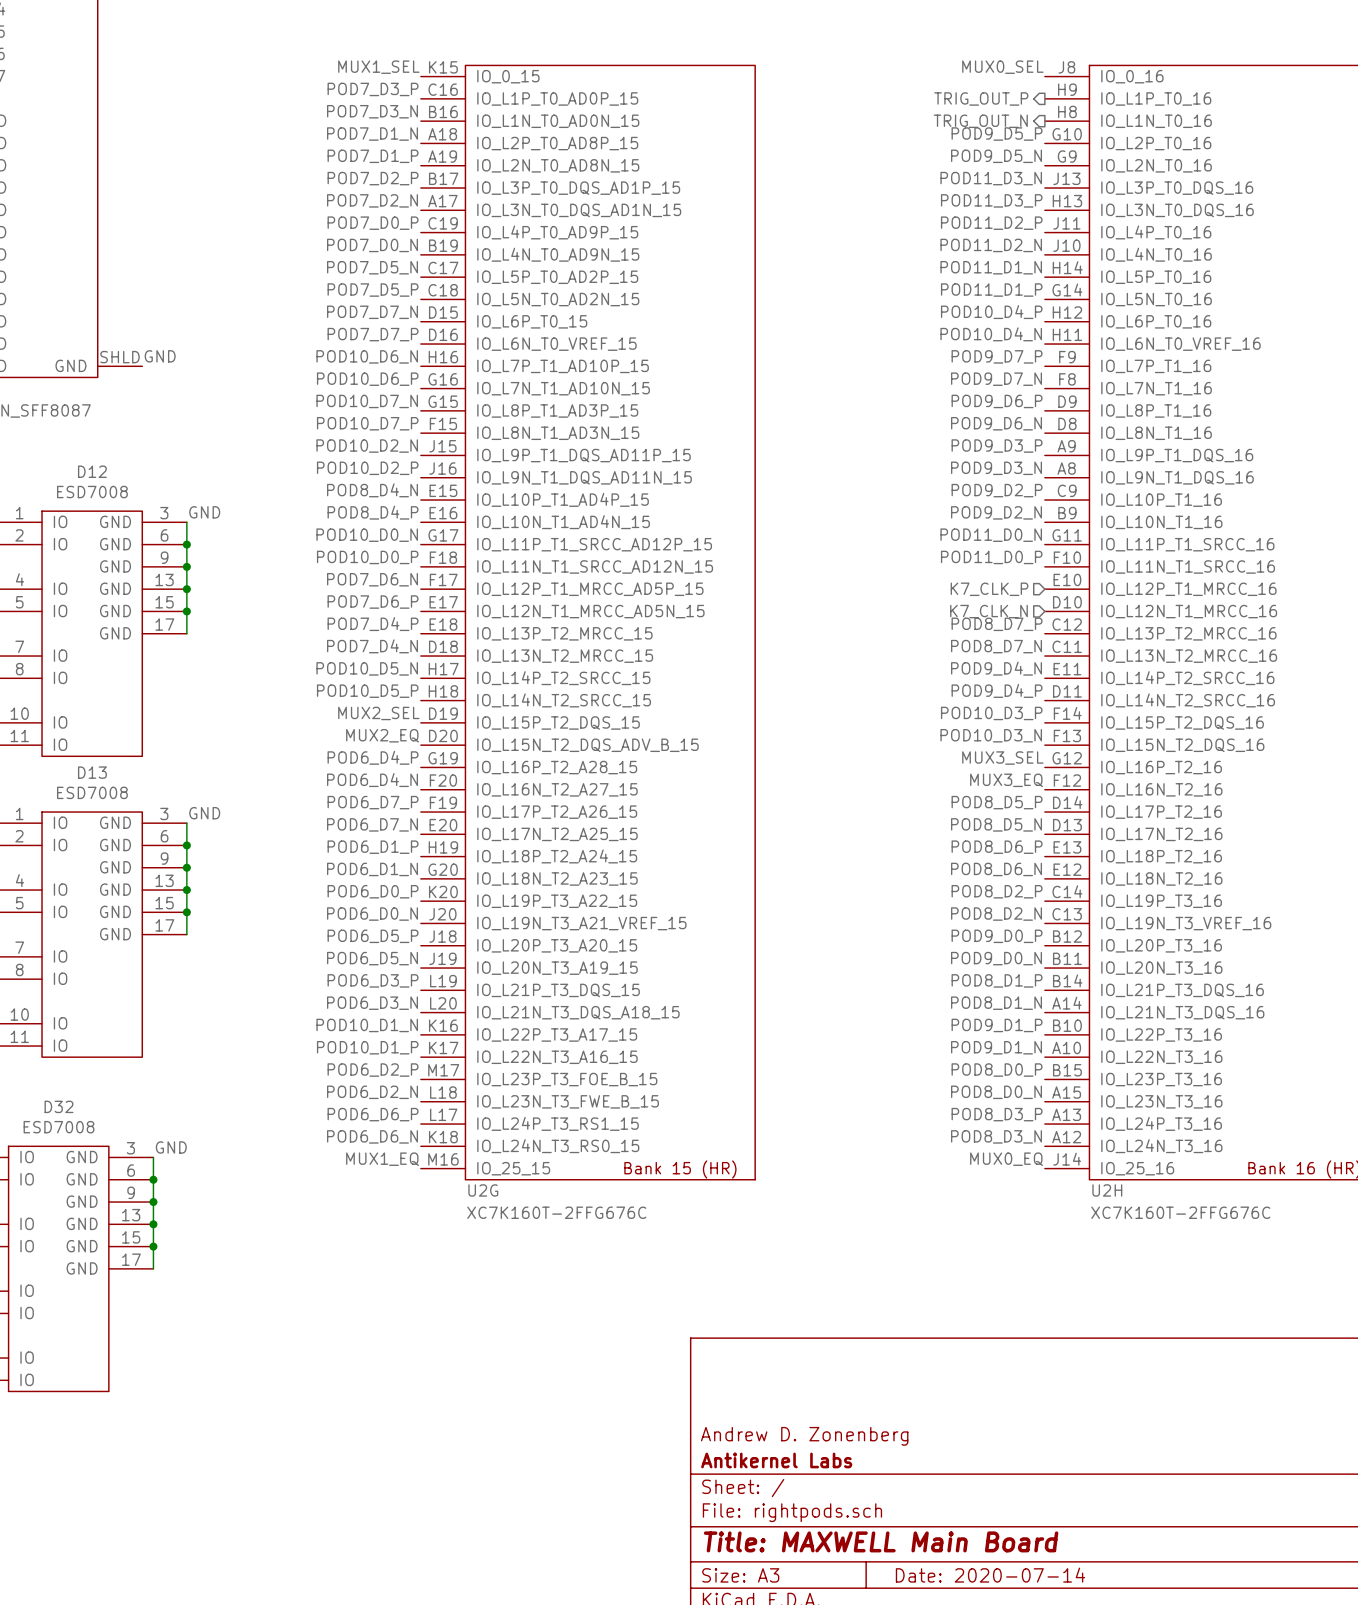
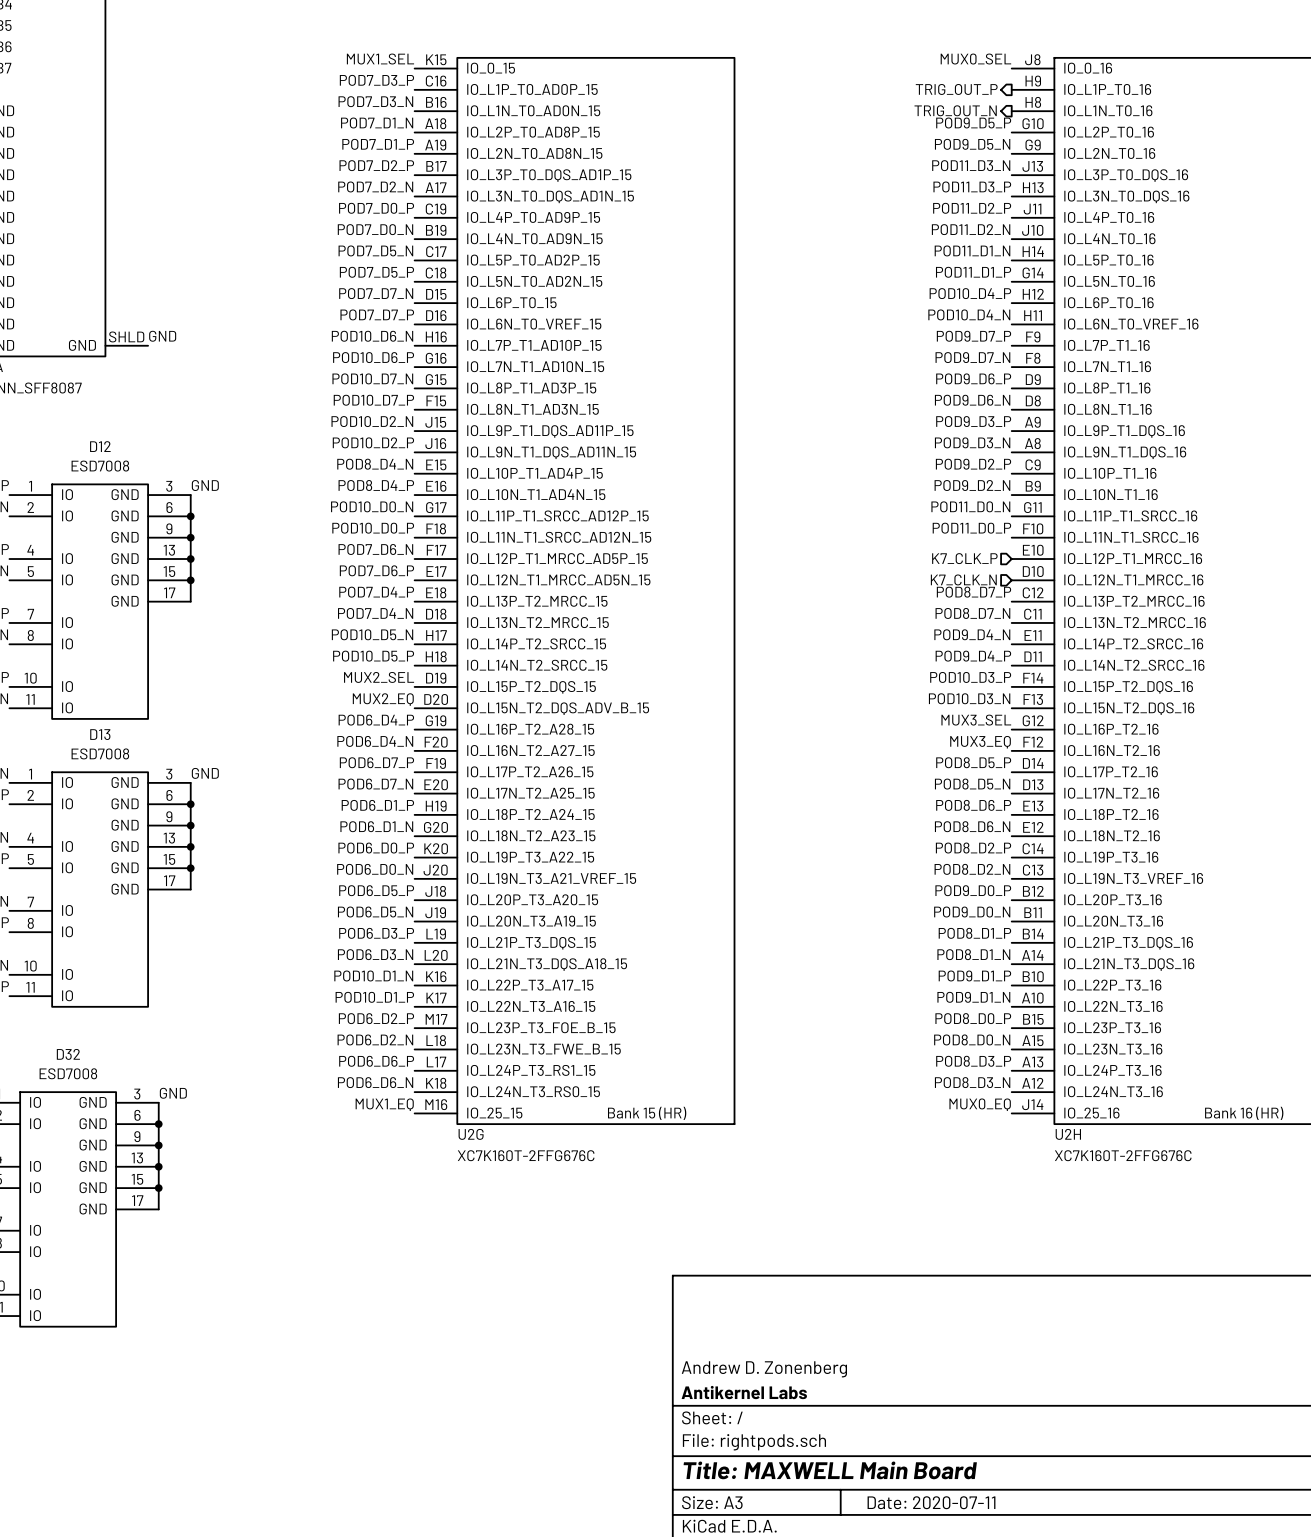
title block: Date: 2020-07-14 (990, 1575) -> Date: 2020-07-11 (931, 1502)

